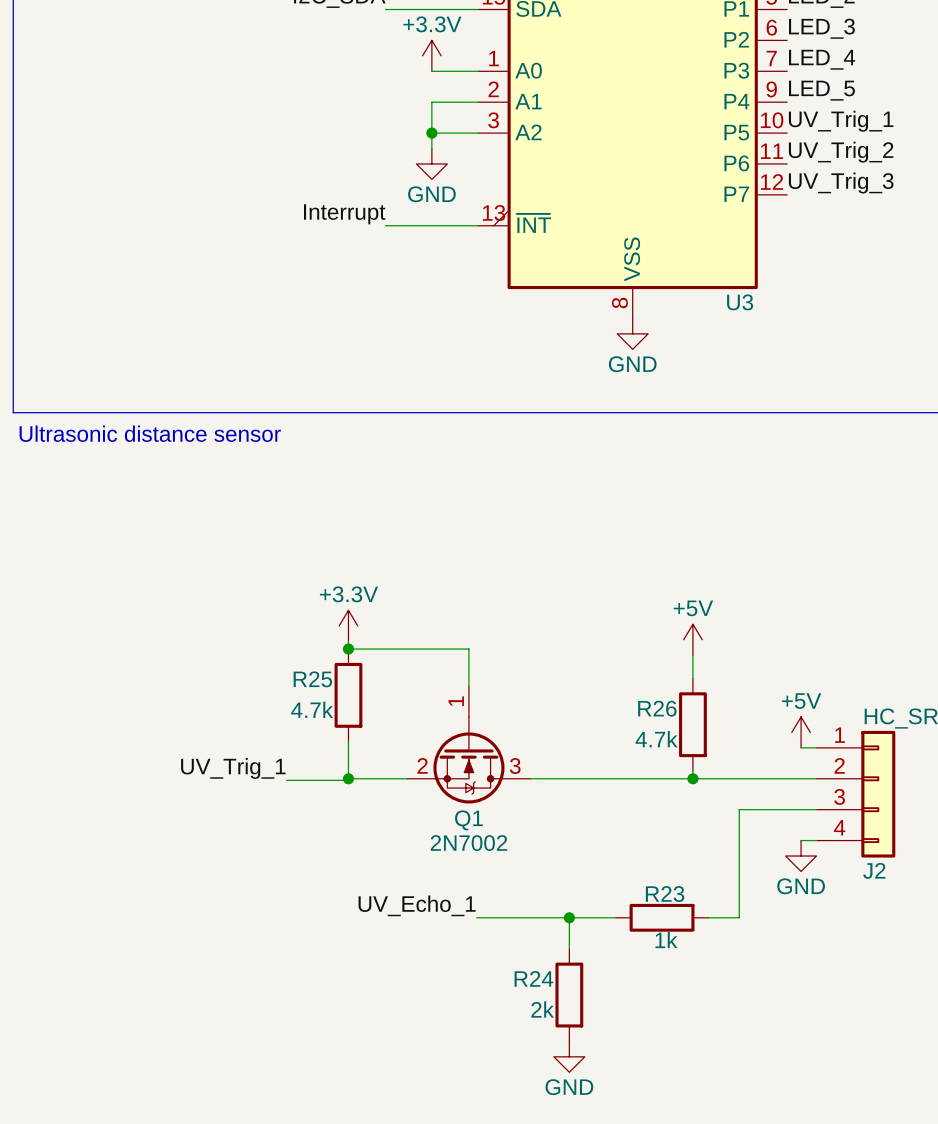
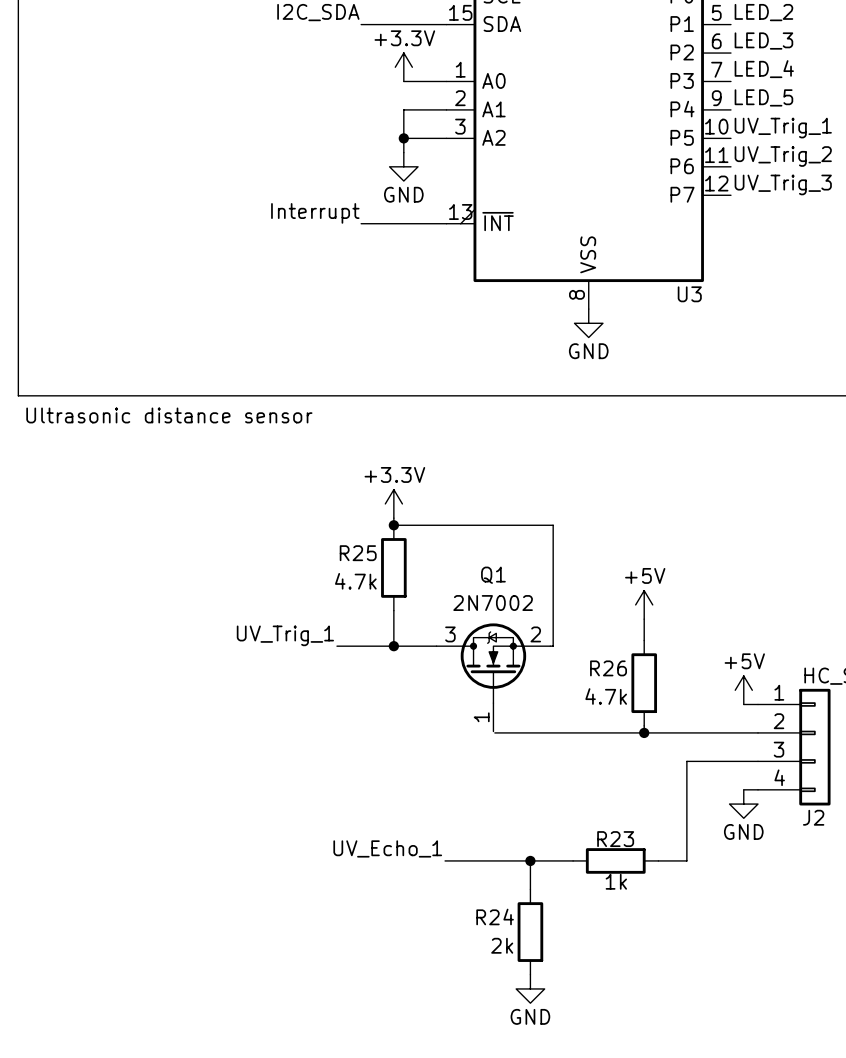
wire: none -> (393, 518) (393, 525) (553, 525) (553, 646) (550, 646)
junction: none -> (393, 525)
power symbol position: +3.3V (348, 625) -> +3.3V (393, 503)
wire: (348, 641) (348, 649) (468, 649) (468, 686) -> none
wire: none -> (393, 610) (393, 646)
junction: (348, 649) -> none
wire: none -> (336, 646) (436, 646)
junction: none -> (393, 646)
R25 position: (348, 695) -> (393, 567)
wire: (348, 741) (348, 780) (286, 780) -> none
Q1 rotation: 0° (468, 760) -> 180° (493, 663)
label position: UV_Trig_1 (233, 768) -> UV_Trig_1 (285, 635)
wire: (348, 778) (407, 778) -> none
junction: (348, 778) -> none
Q1 name position: Q1 (468, 820) -> Q1 (493, 575)

